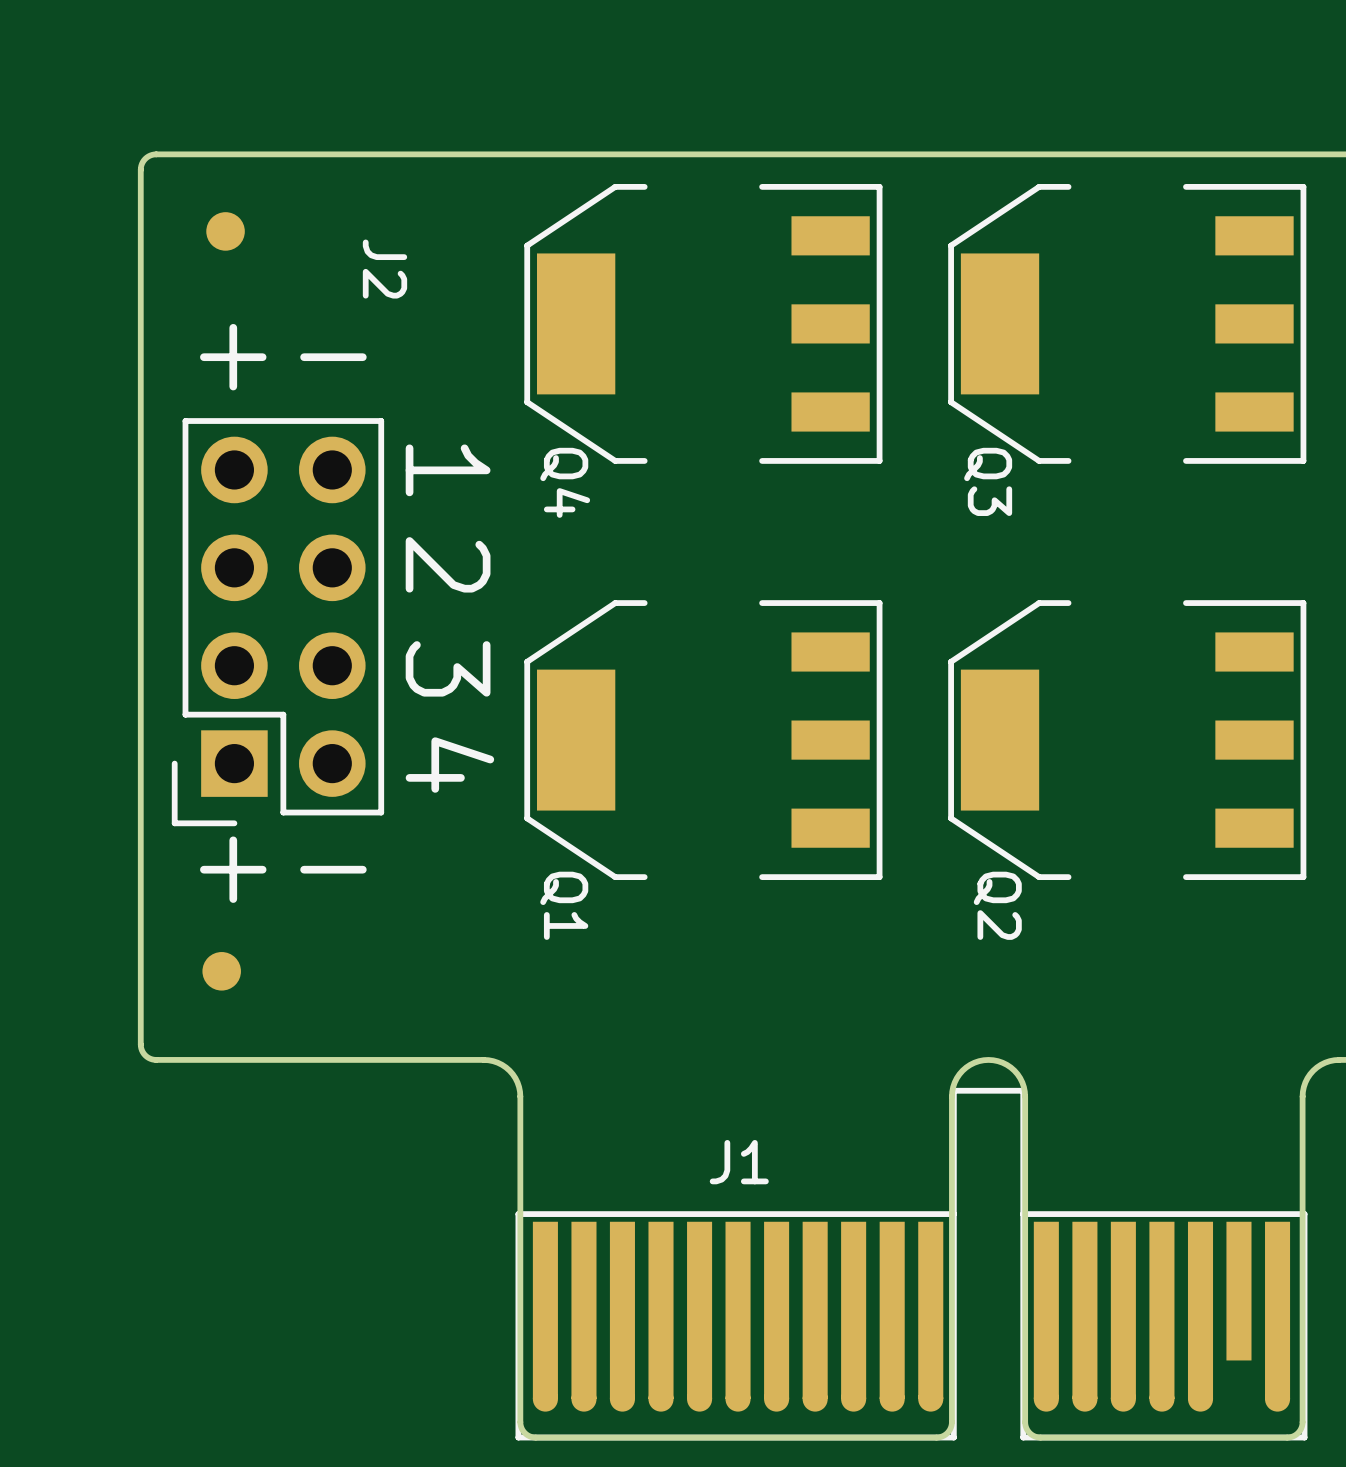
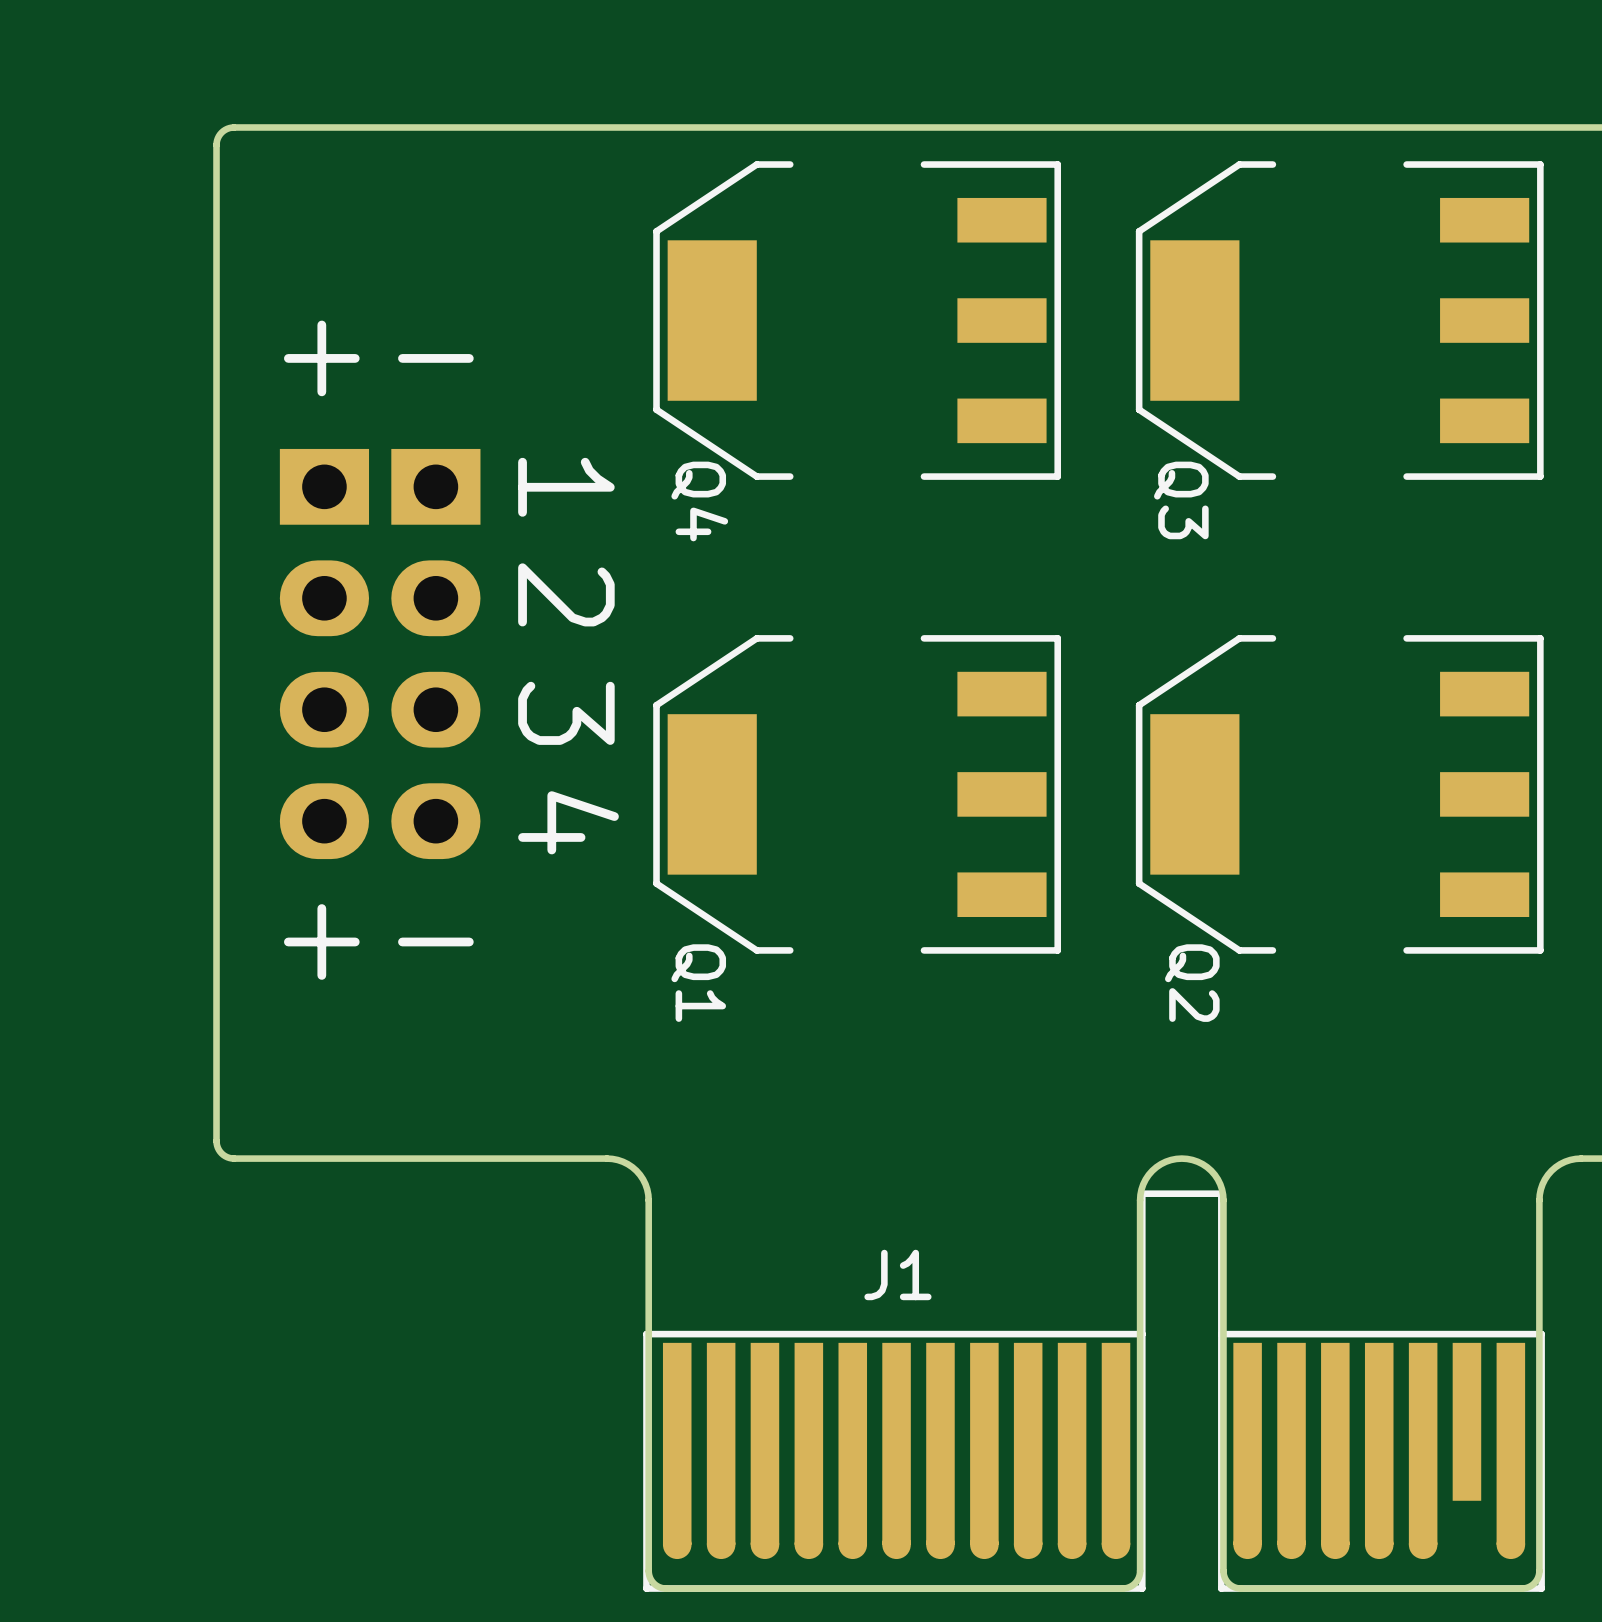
part: (225, 231) -> none
part: none -> (324, 654)
part: none -> (435, 654)
J2: (277, 622) -> none
part: (221, 971) -> none

